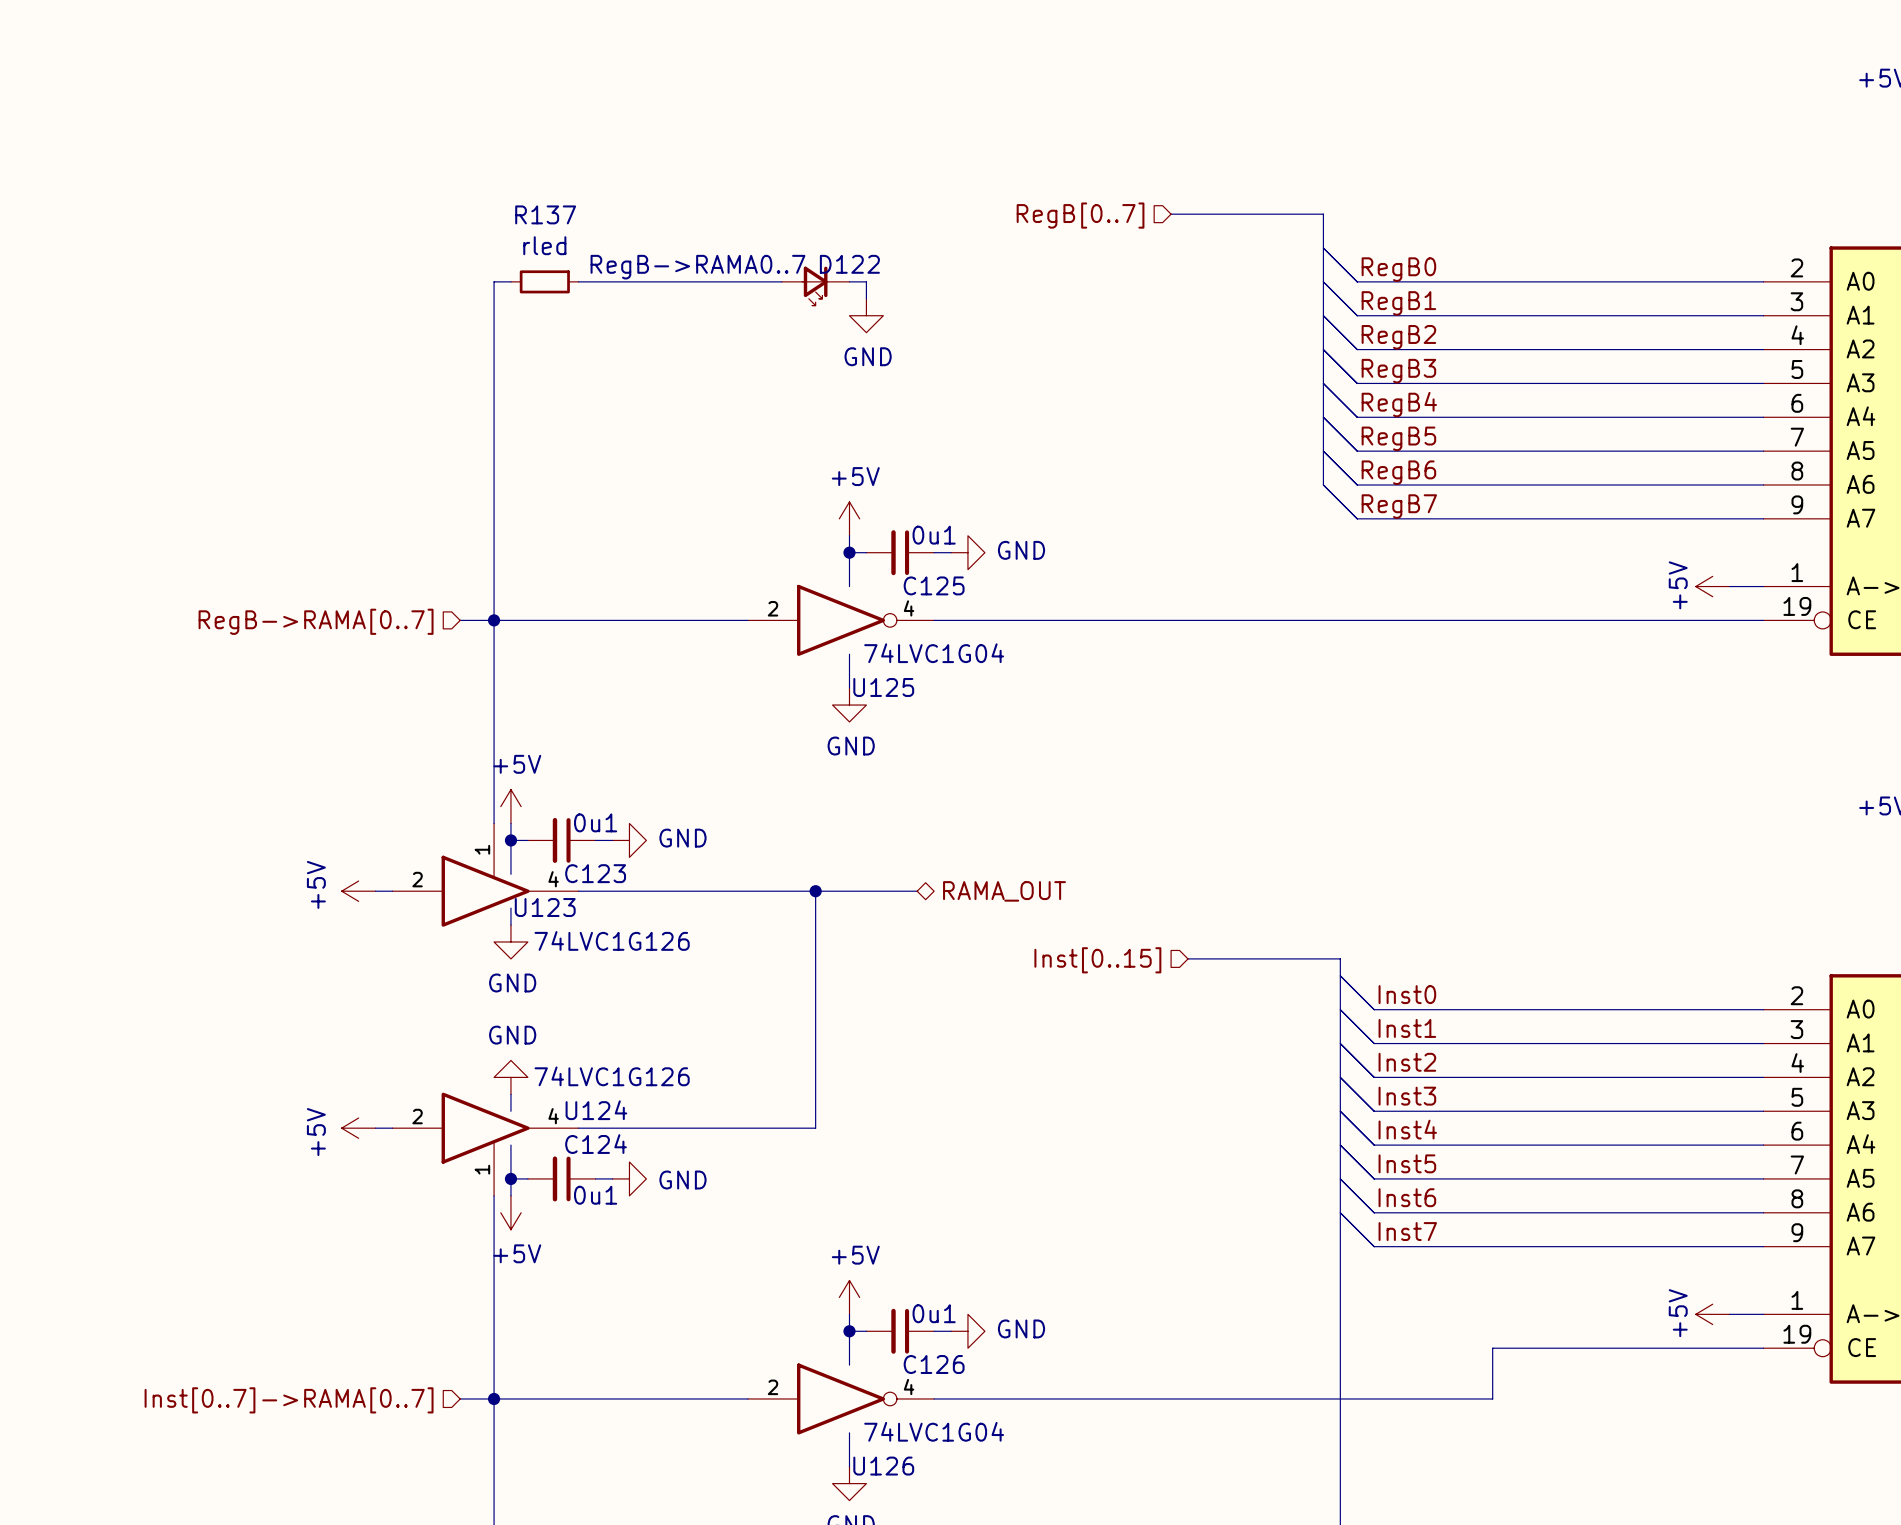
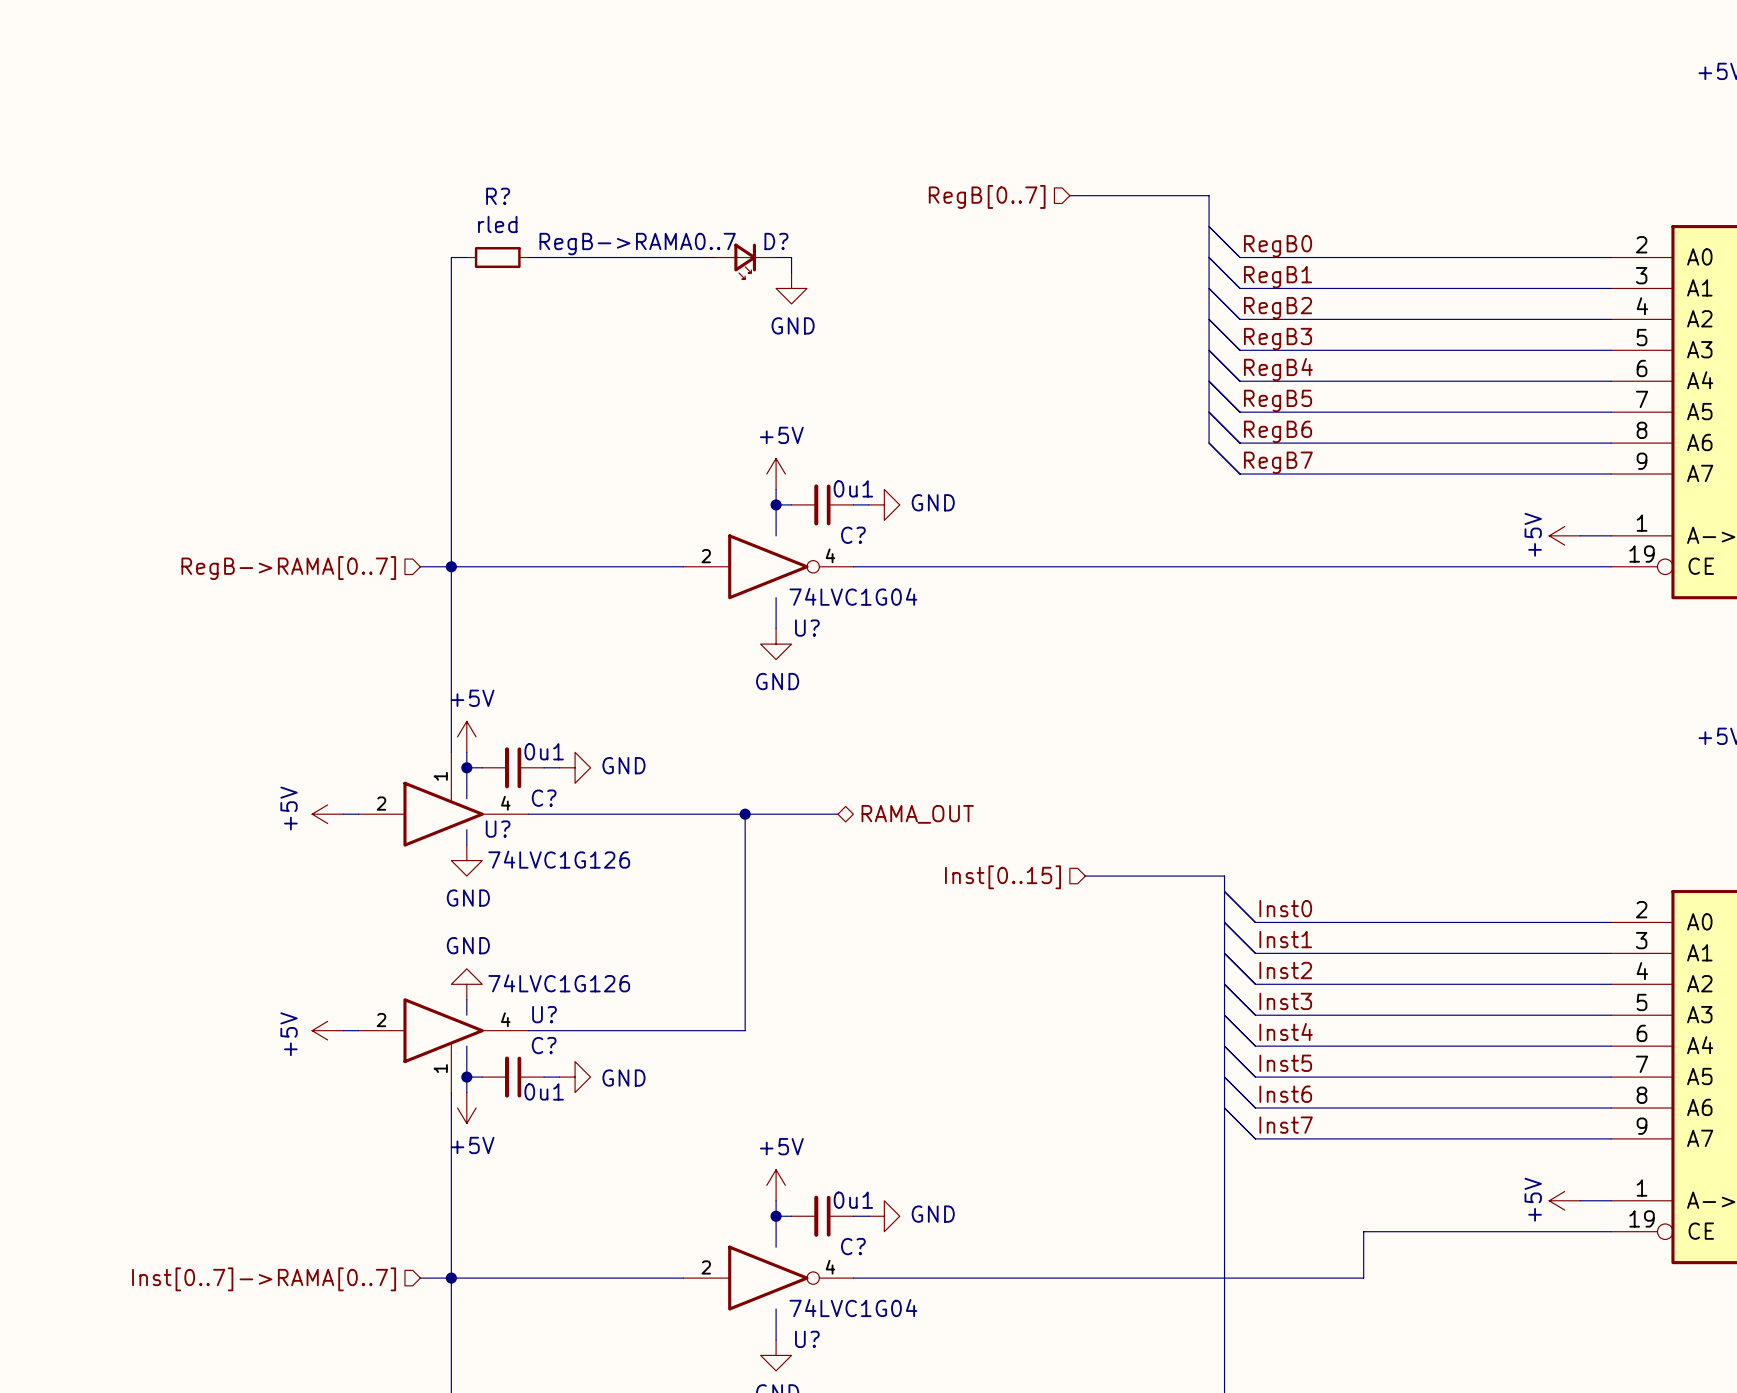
R137 name: R137 (545, 214) -> R? (498, 196)
D122 name: D122 (849, 264) -> D? (776, 241)
C125 name: C125 (934, 585) -> C? (853, 535)
U125 name: U125 (883, 687) -> U? (807, 628)
C123 name: C123 (595, 873) -> C? (544, 798)
U123 name: U123 (545, 907) -> U? (498, 829)
U124 name: U124 (596, 1110) -> U? (544, 1014)
C124 name: C124 (596, 1144) -> C? (544, 1045)
C126 name: C126 (934, 1364) -> C? (853, 1246)
U126 name: U126 (883, 1466) -> U? (807, 1339)

